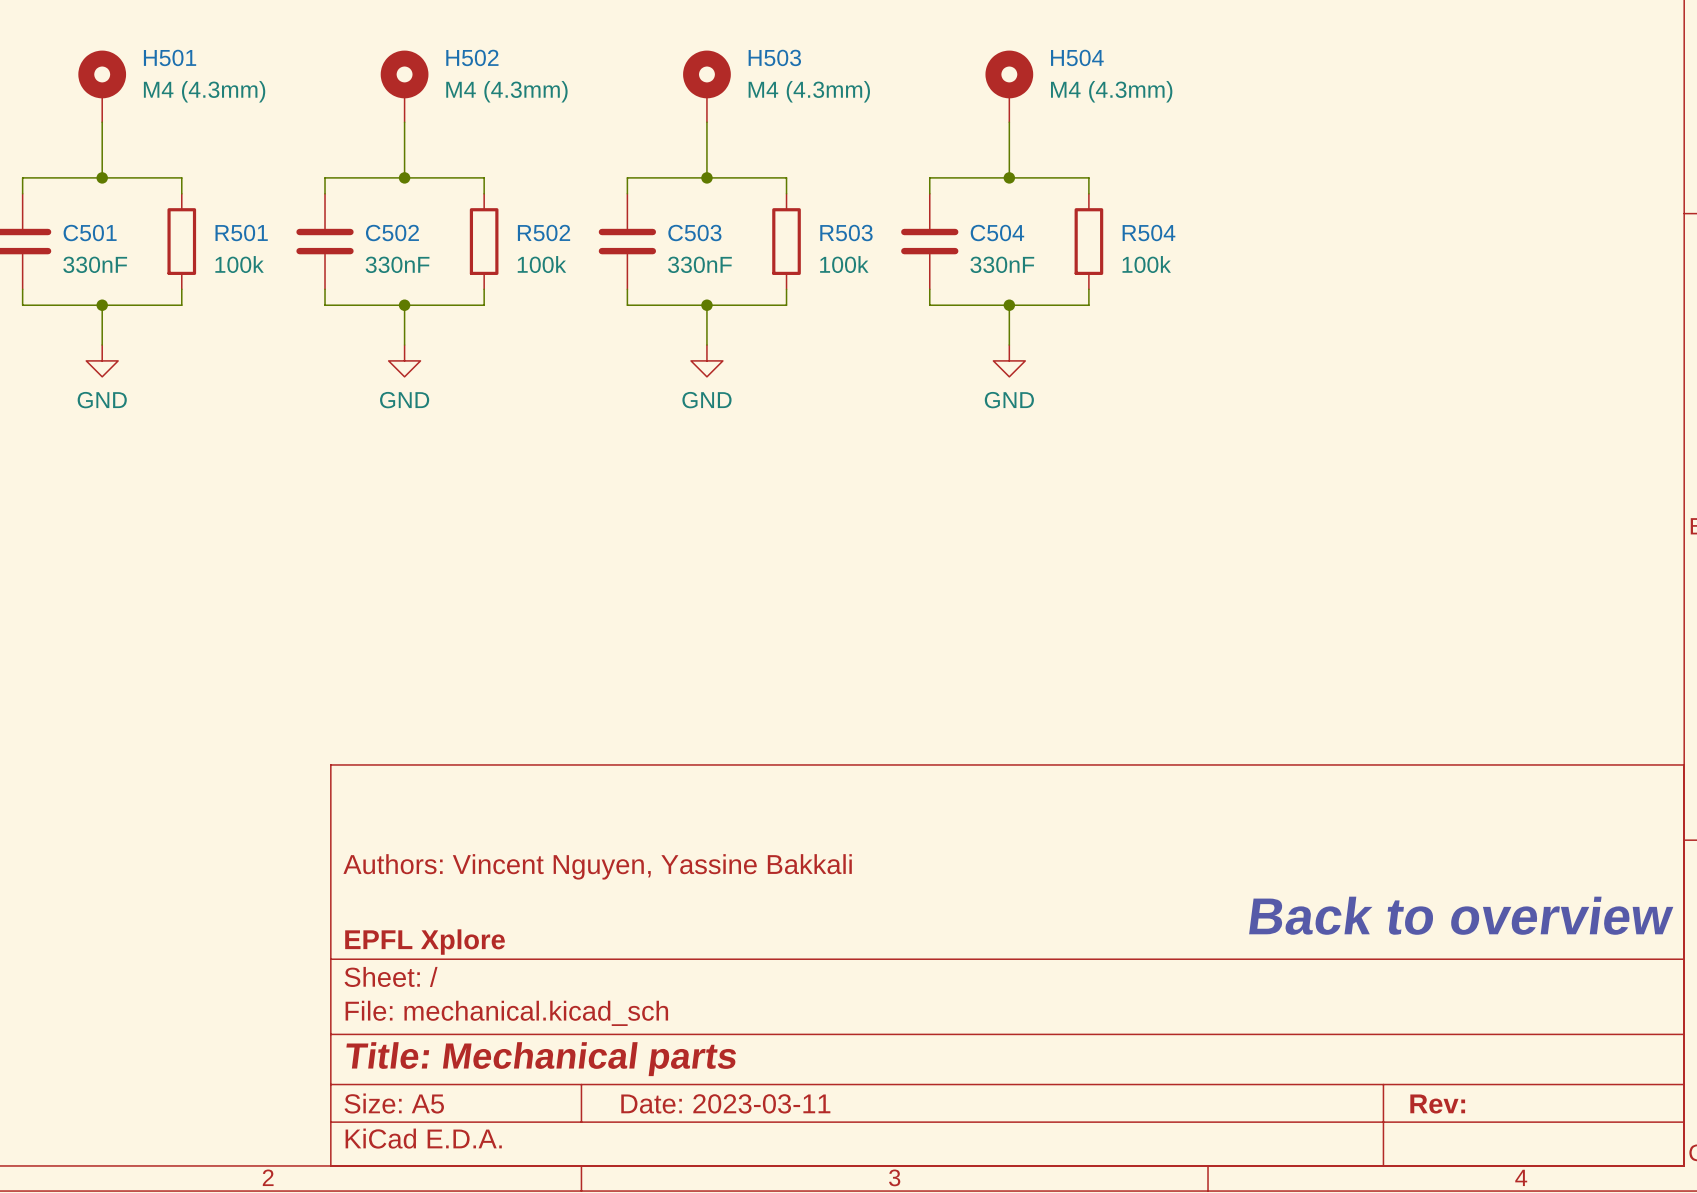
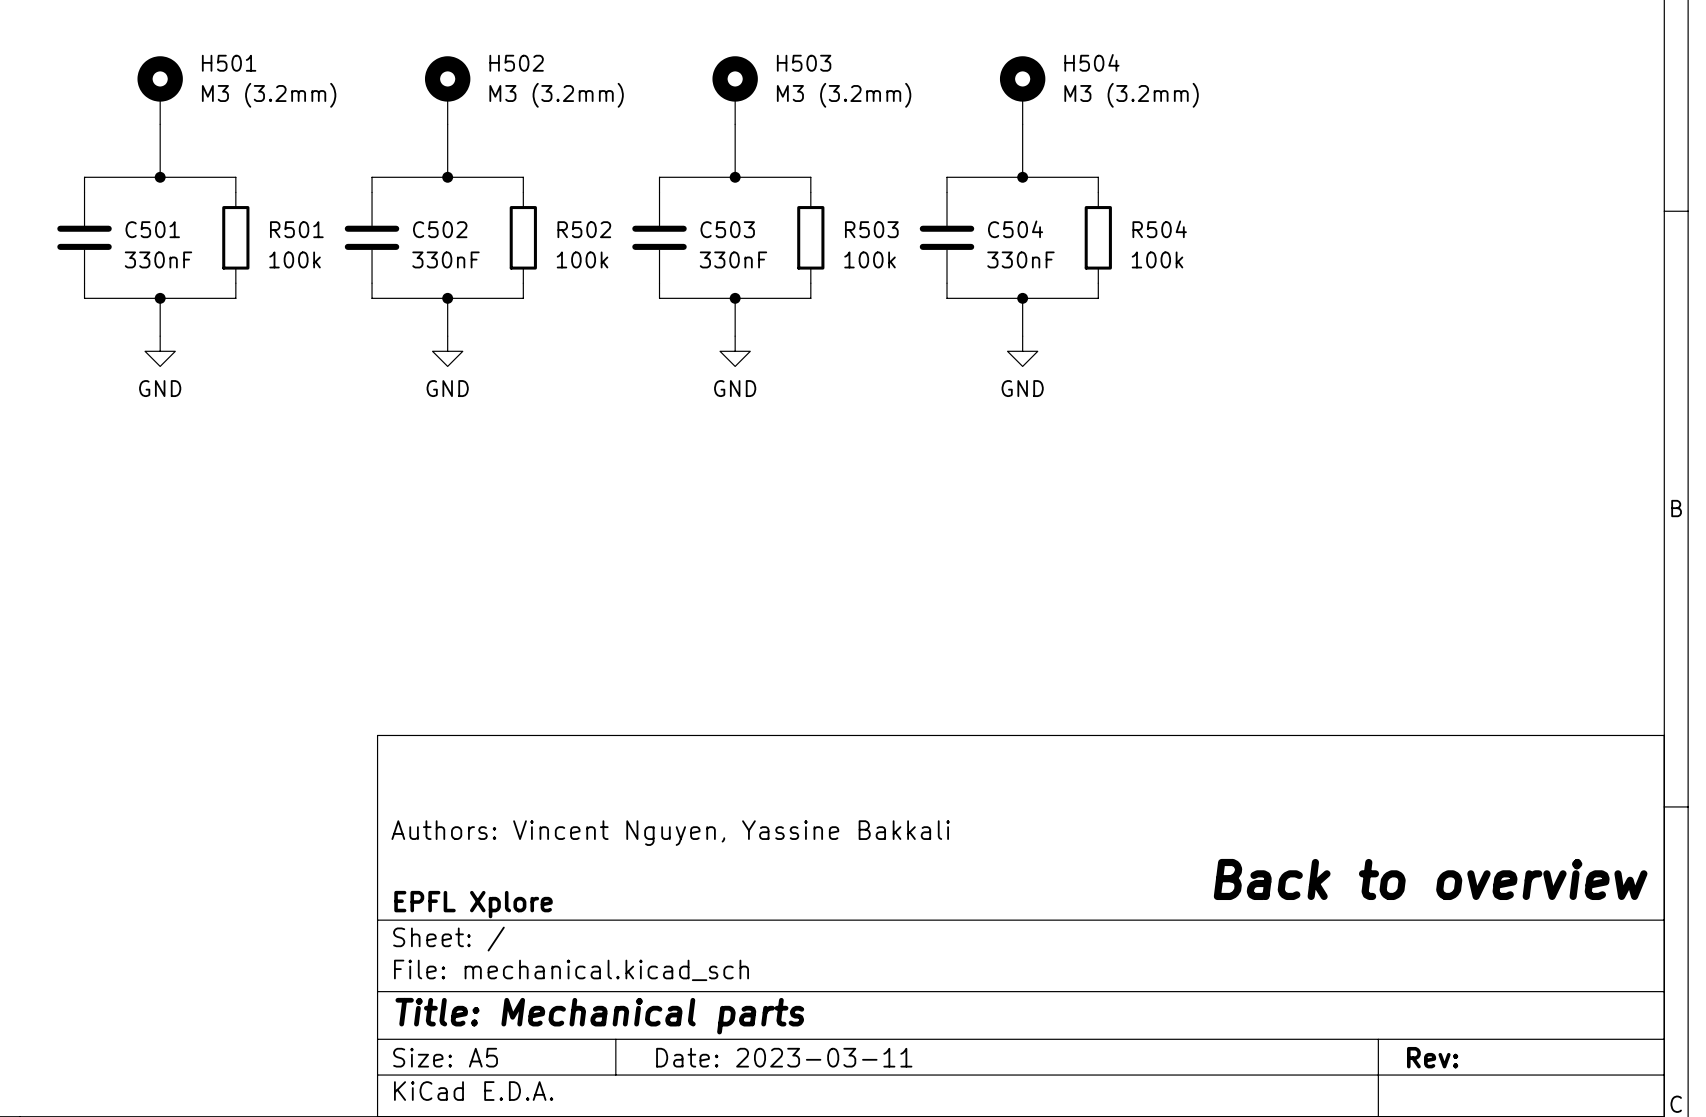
H501 value: M4 (4.3mm) (204, 91) -> M3 (3.2mm) (269, 95)
H502 value: M4 (4.3mm) (506, 91) -> M3 (3.2mm) (556, 95)
H503 value: M4 (4.3mm) (809, 91) -> M3 (3.2mm) (844, 95)
H504 value: M4 (4.3mm) (1111, 91) -> M3 (3.2mm) (1131, 95)

